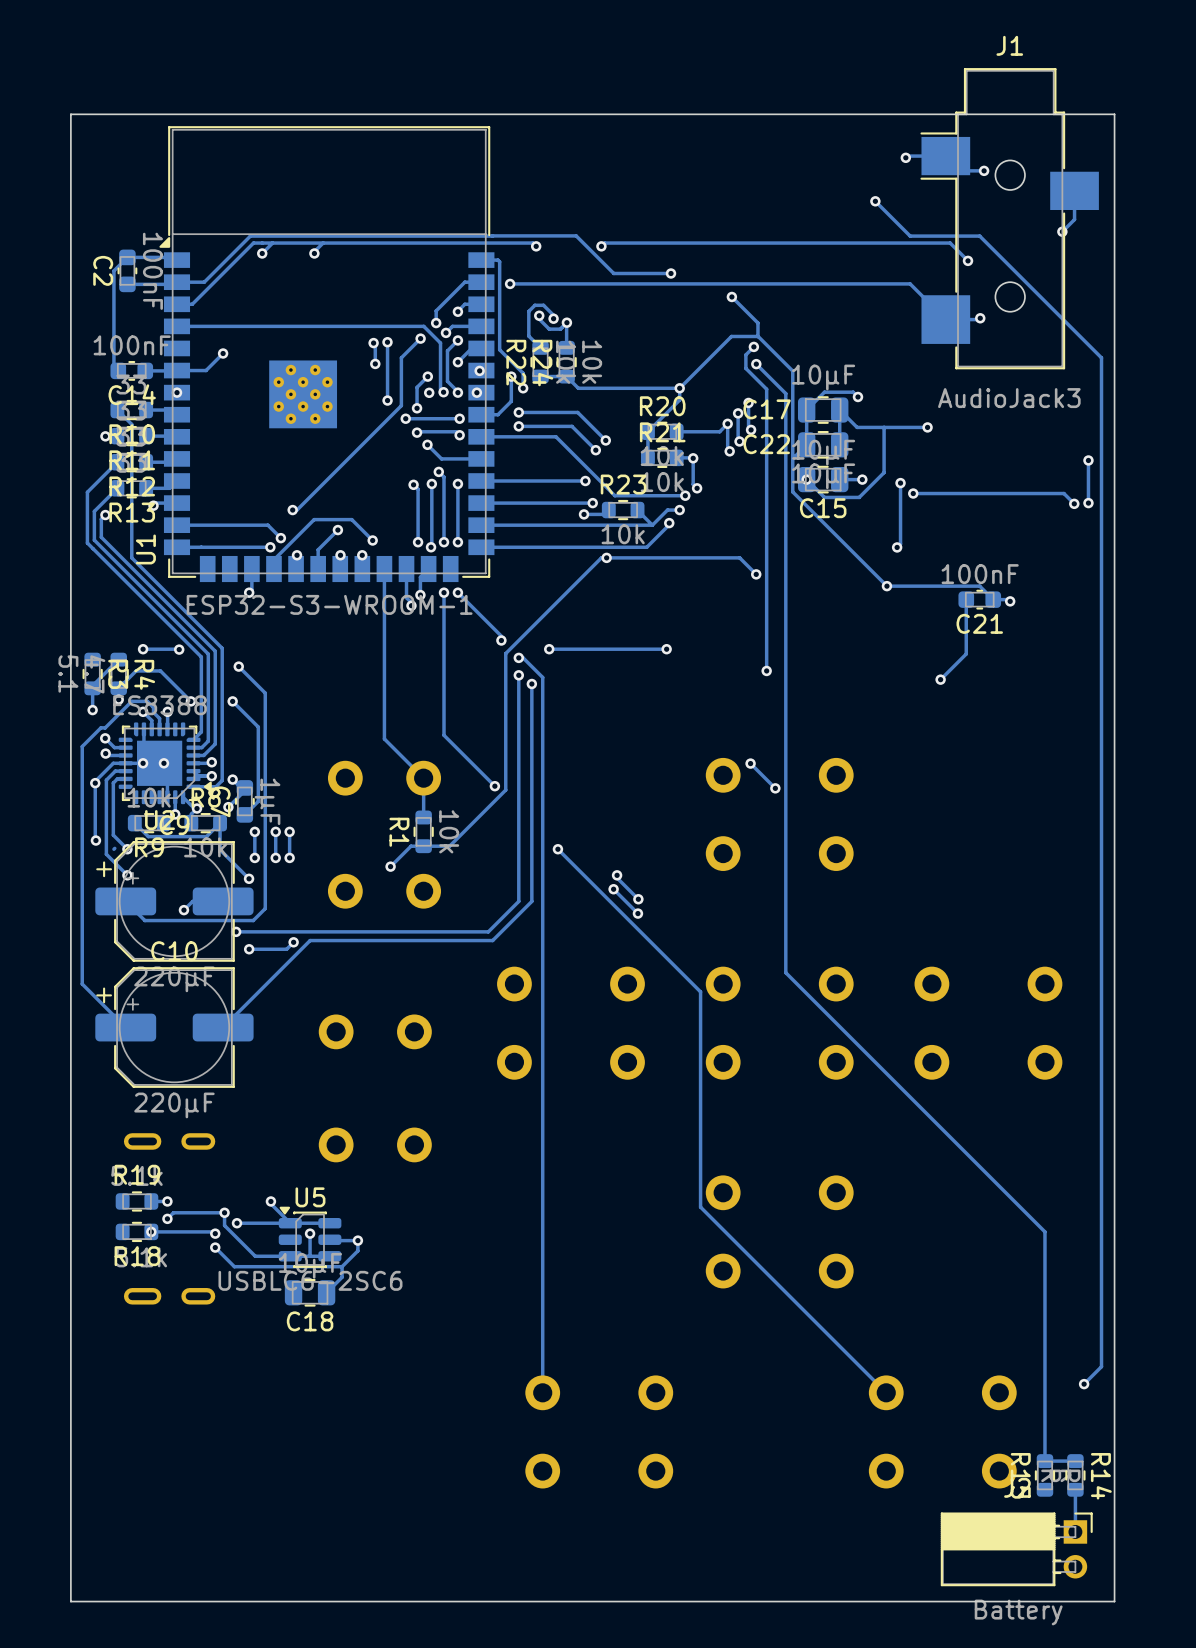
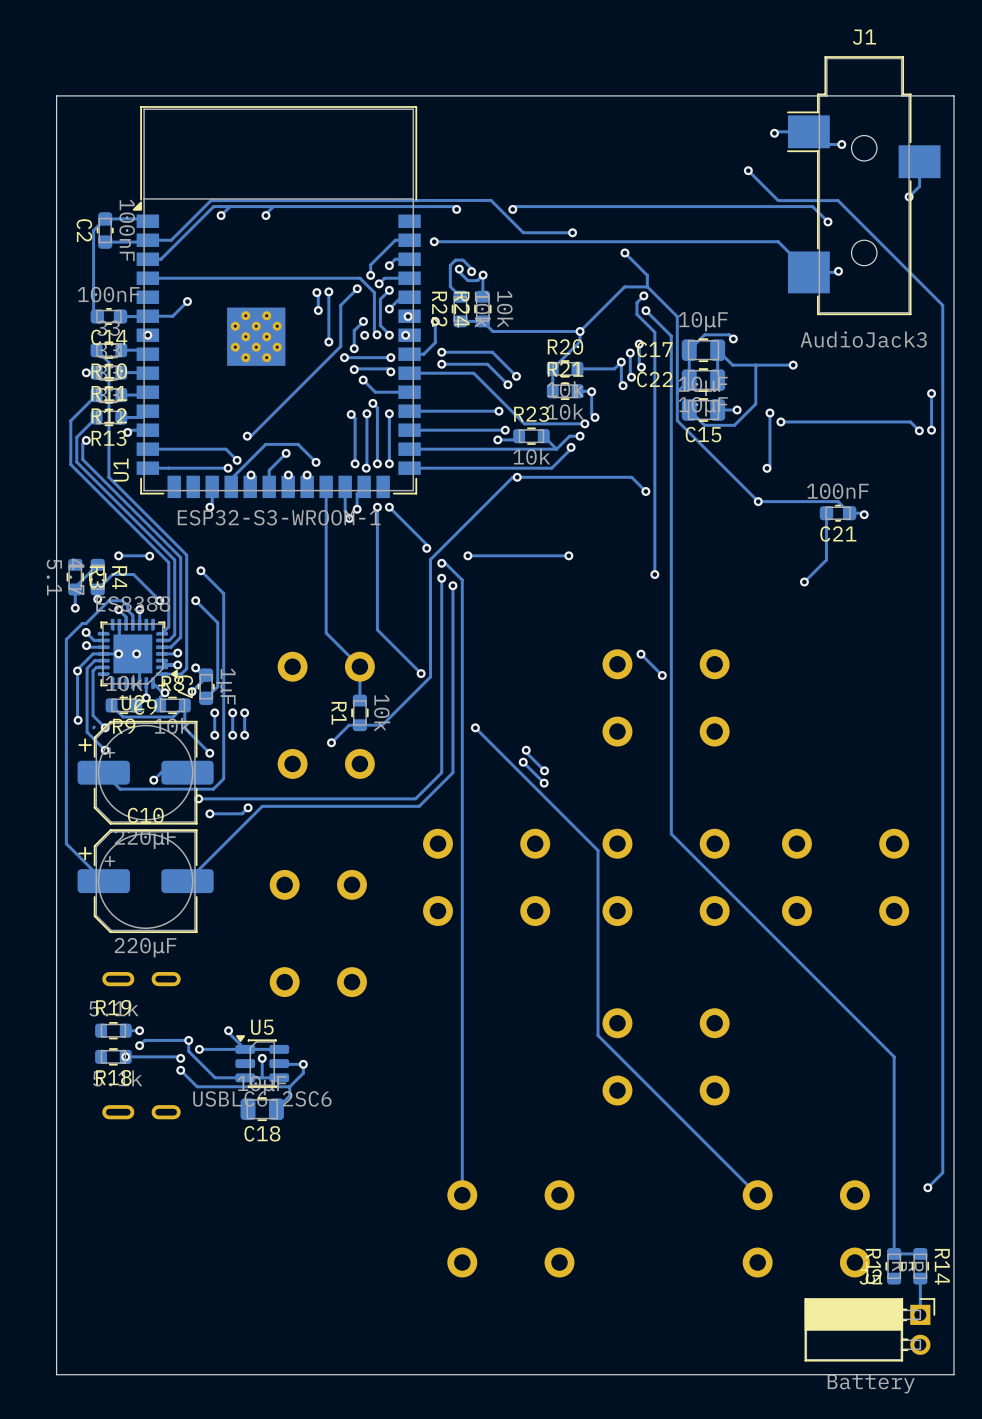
track: (481, 260) (497, 260) (499, 261) (499, 349) (523, 373) (523, 388) -> none
via: (523, 388) -> none
via: (806, 479) -> none

